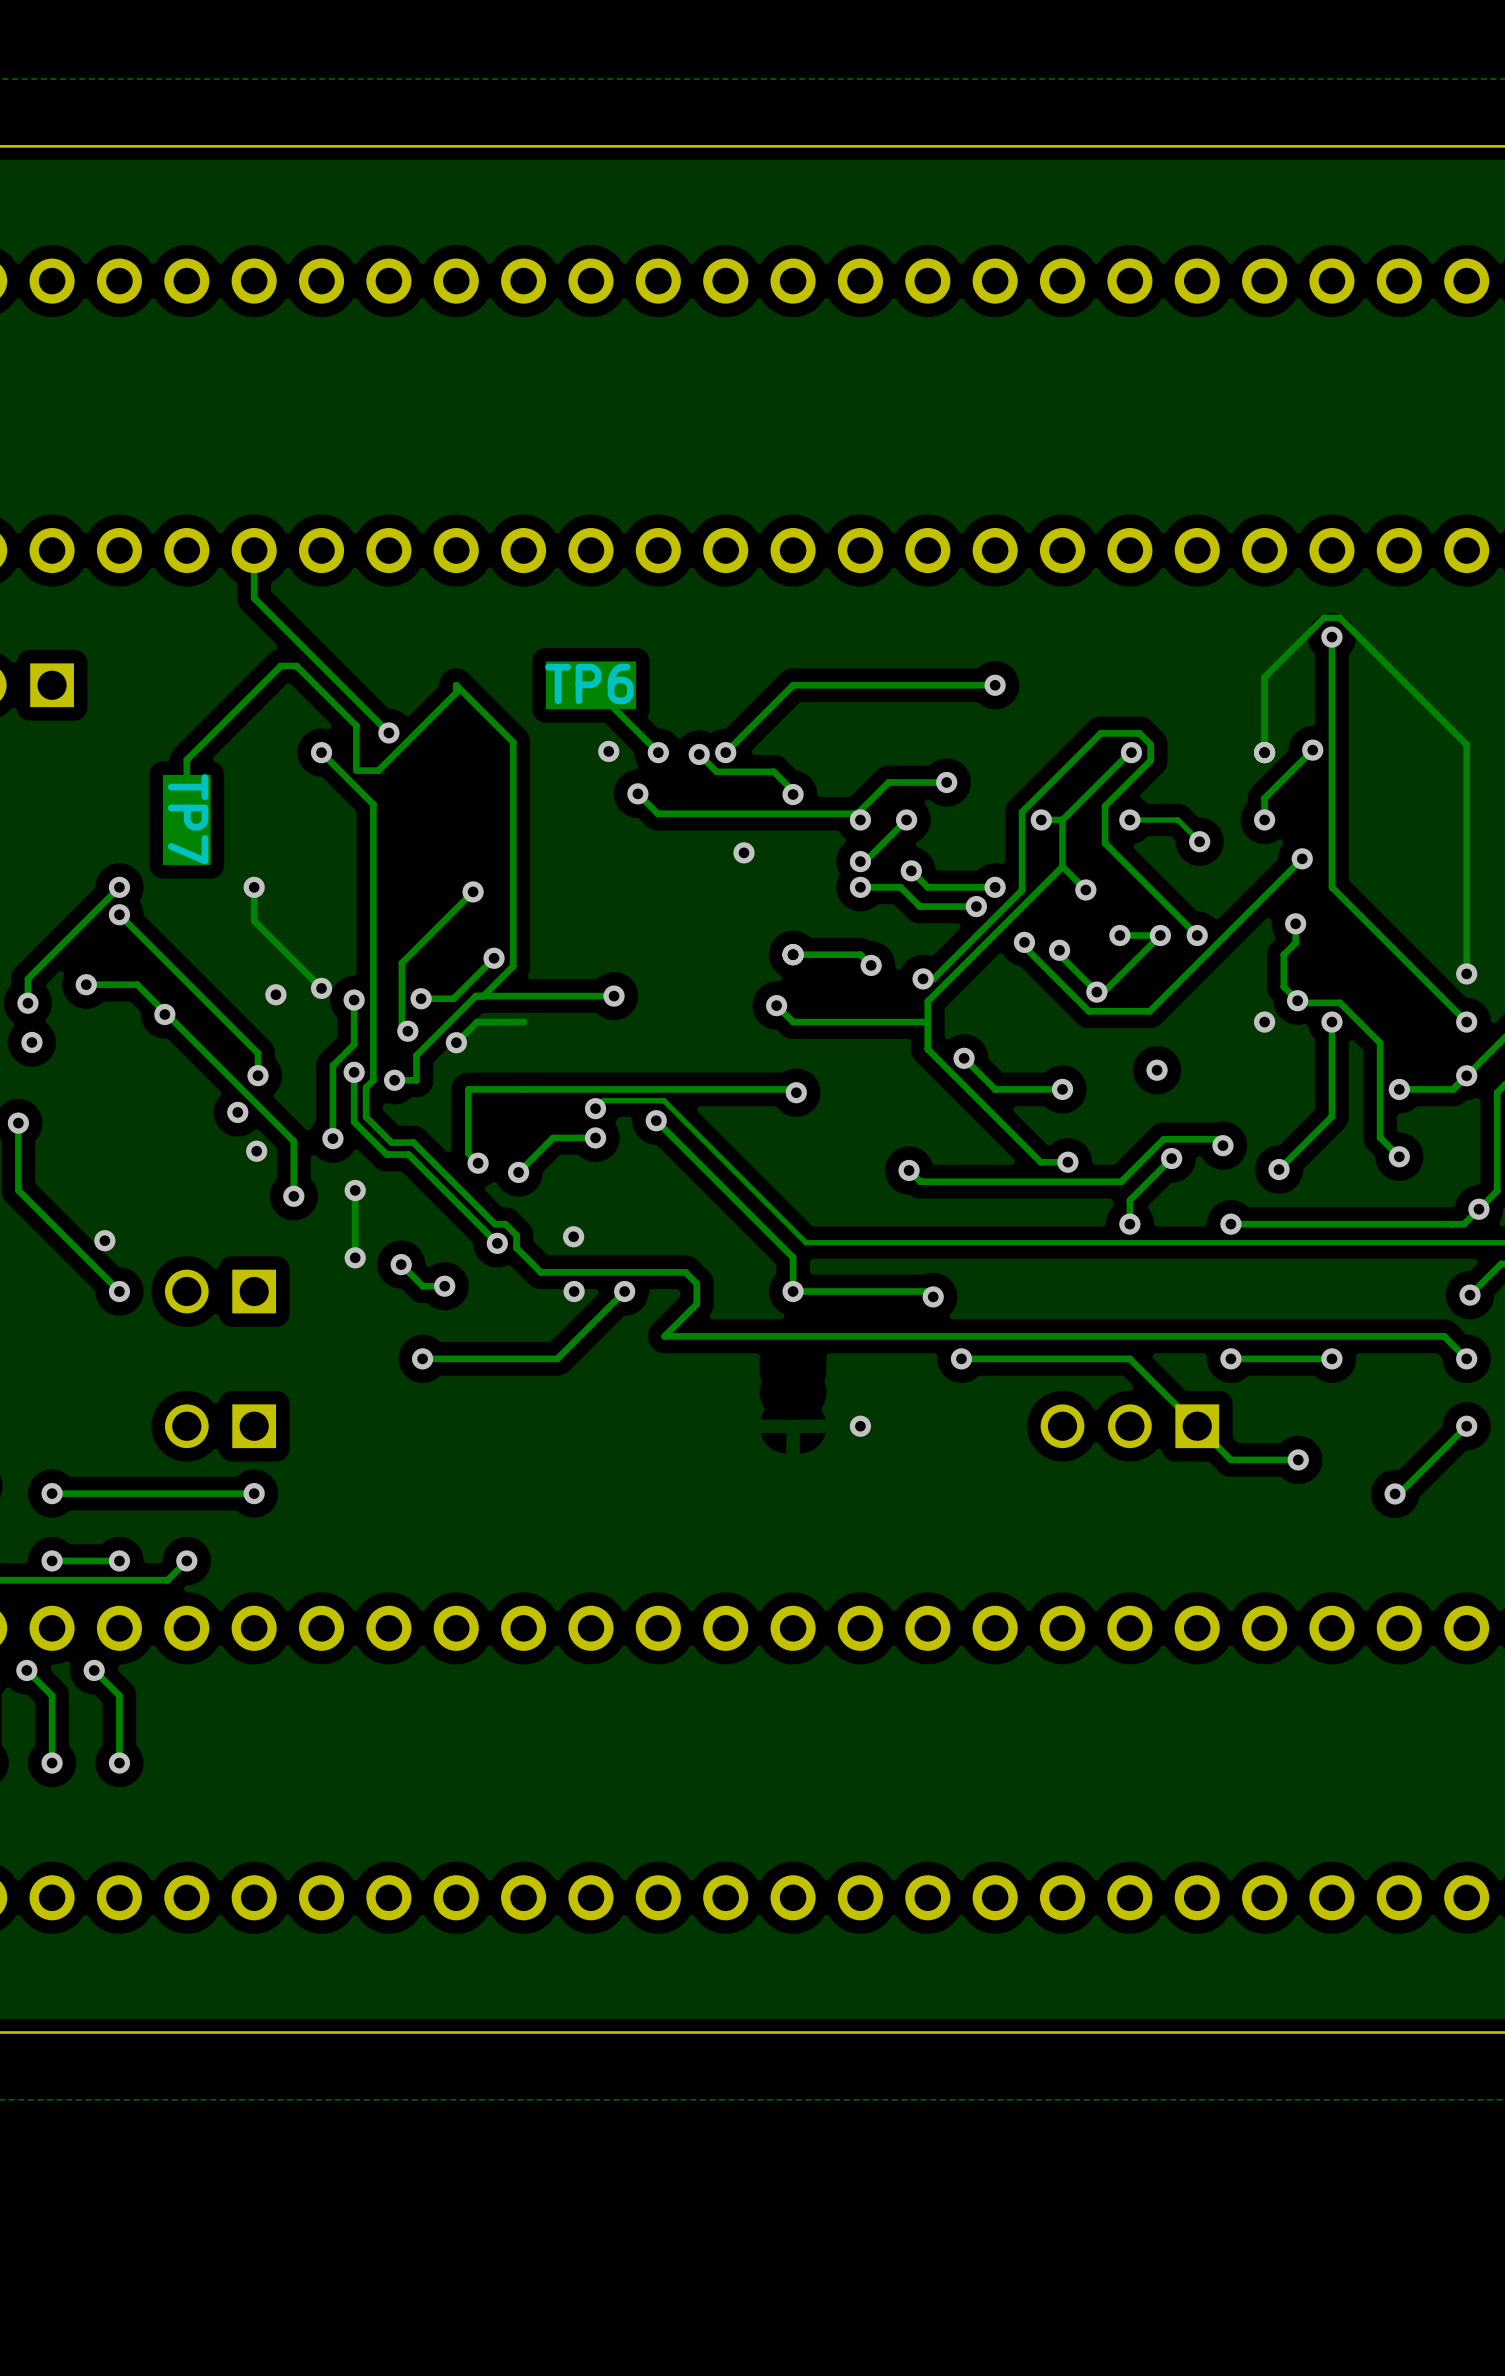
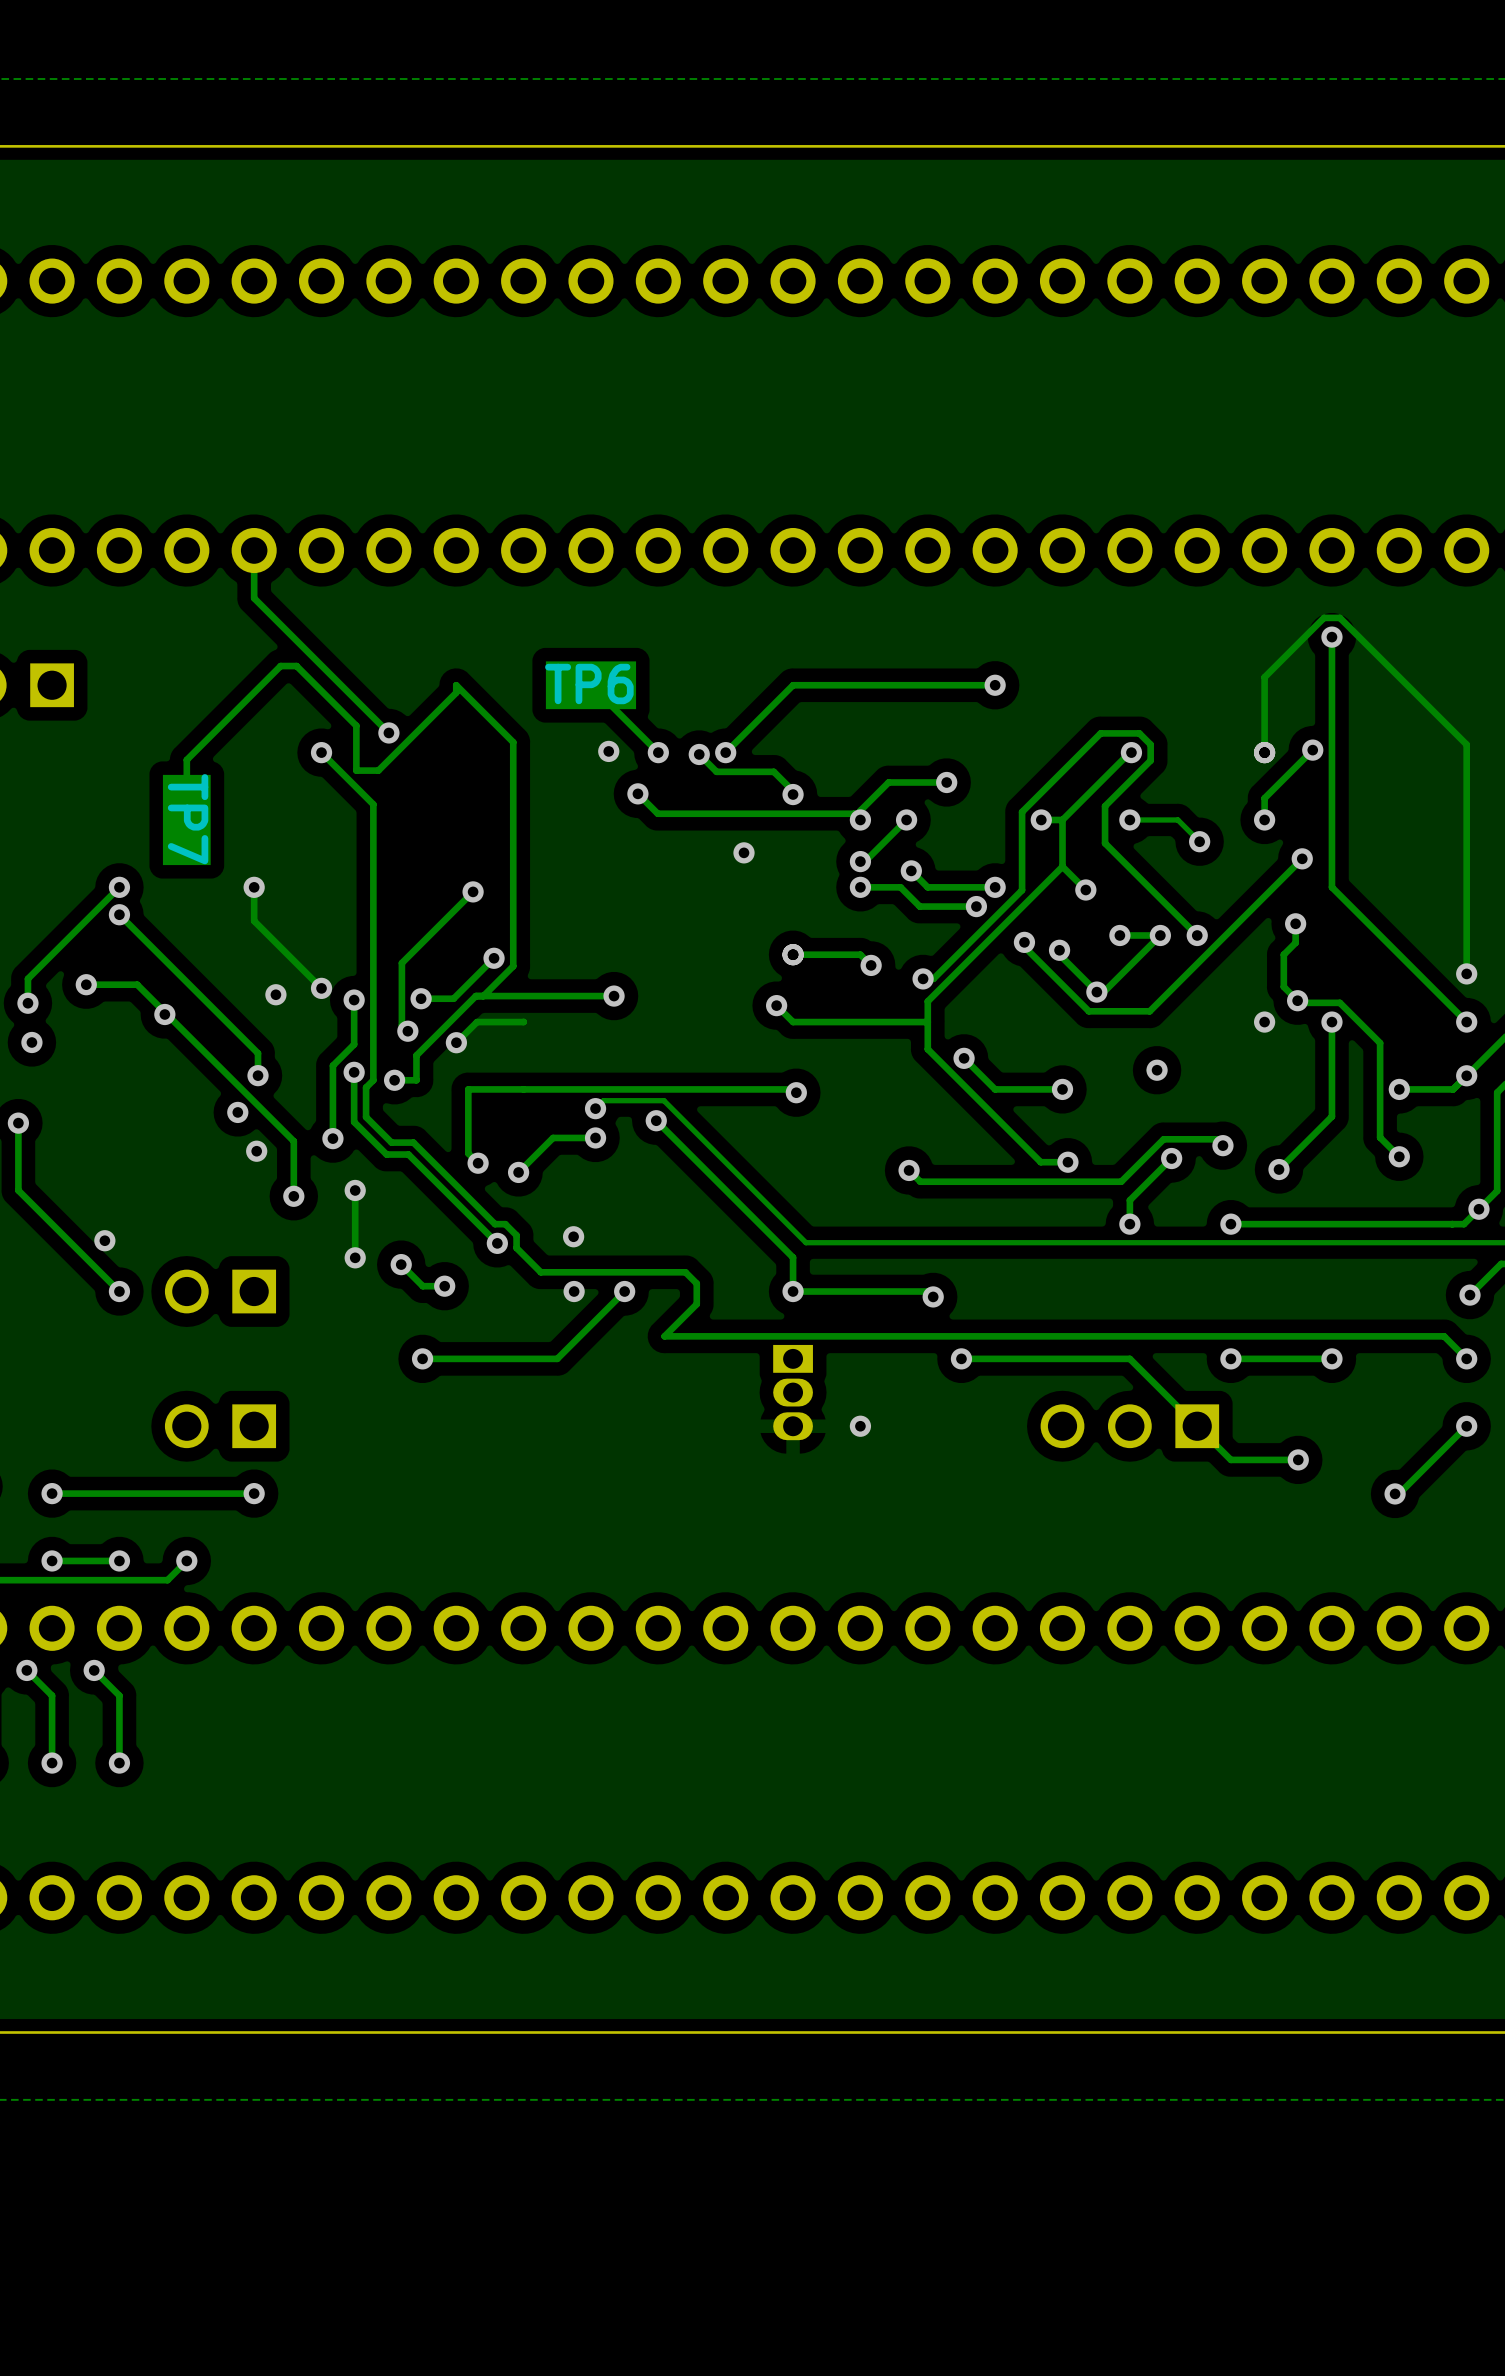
part: none -> (793, 1392)

